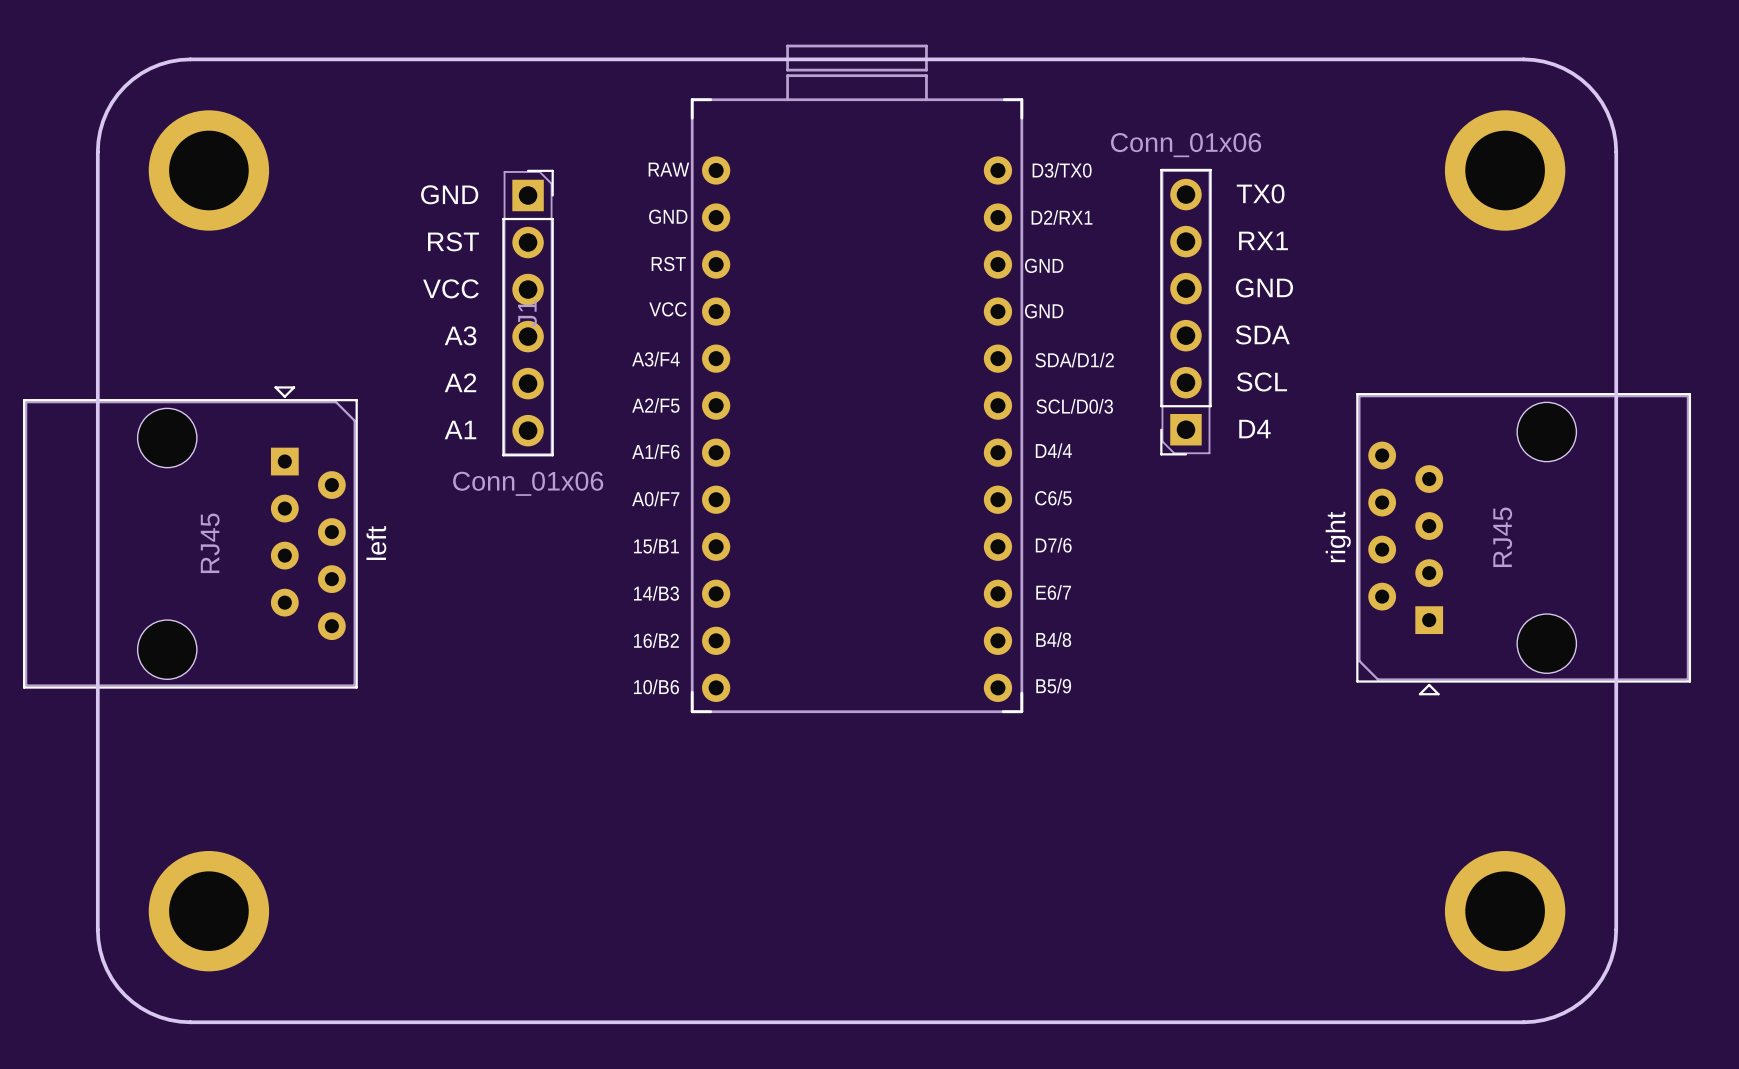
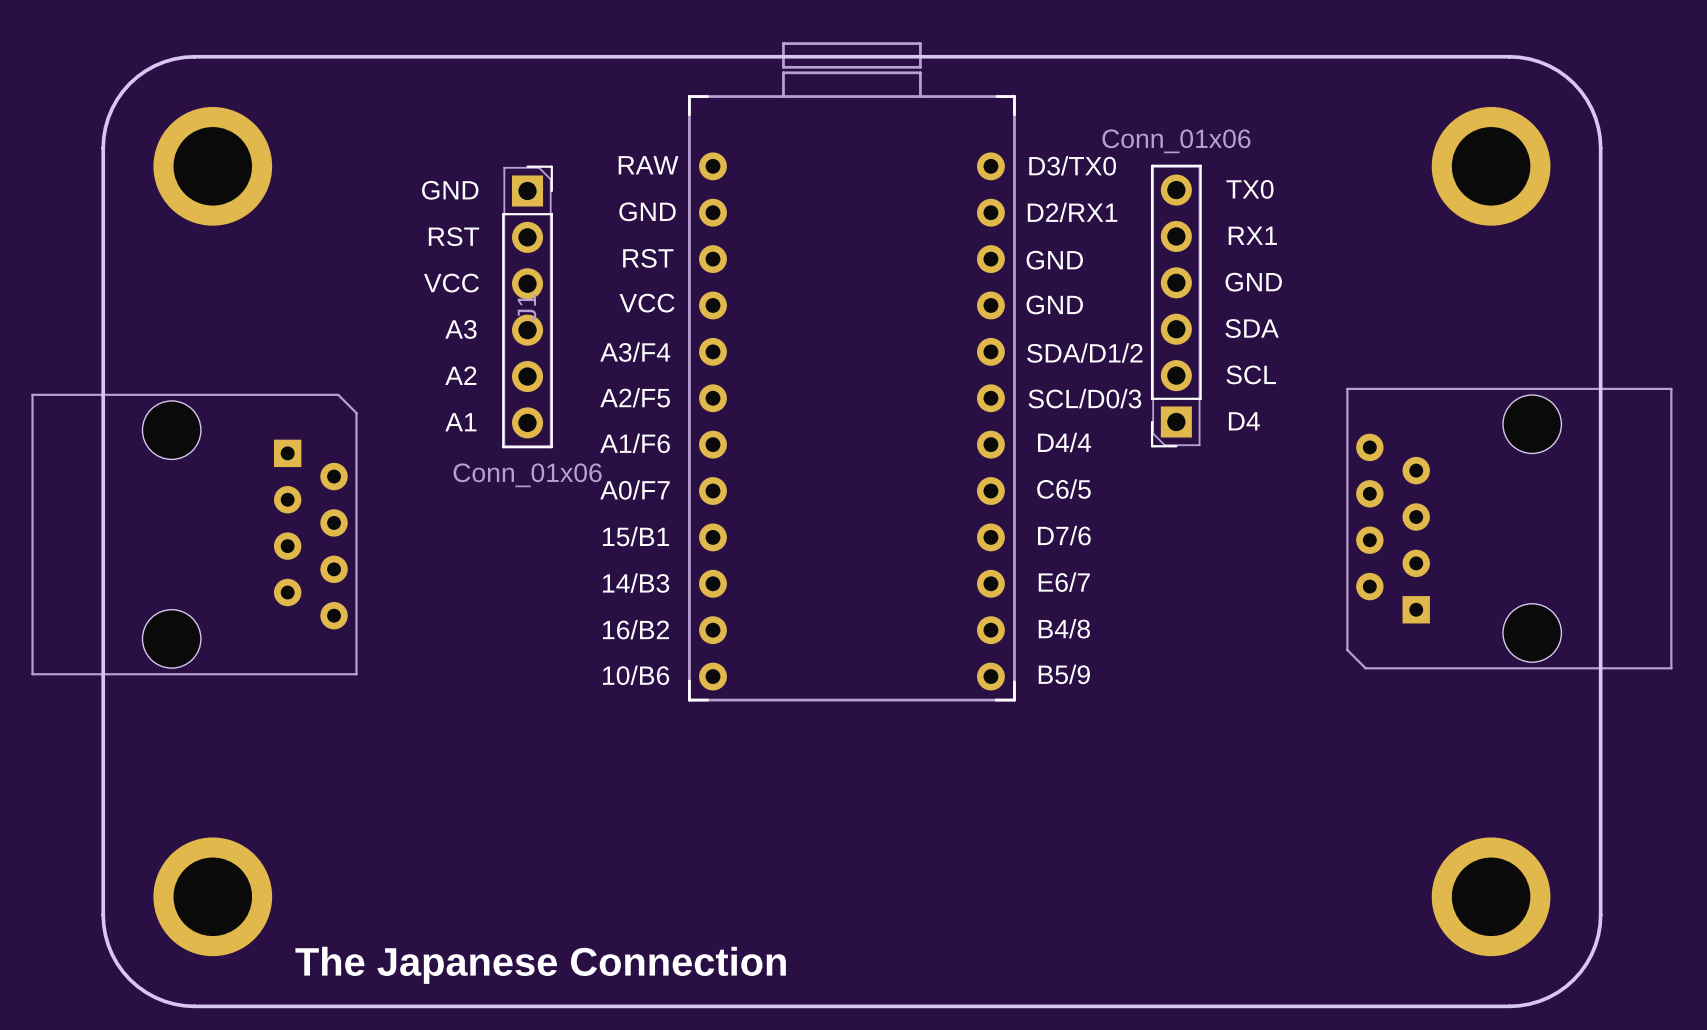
part footprint: [690, 44, 1024, 714] -> [688, 42, 1016, 702]
left: RJ45 (190, 537) -> none
part: none -> (1509, 528)
part: none -> (194, 534)
right: RJ45 (1523, 544) -> none
text: none -> The Japanese Connection (540, 965)

